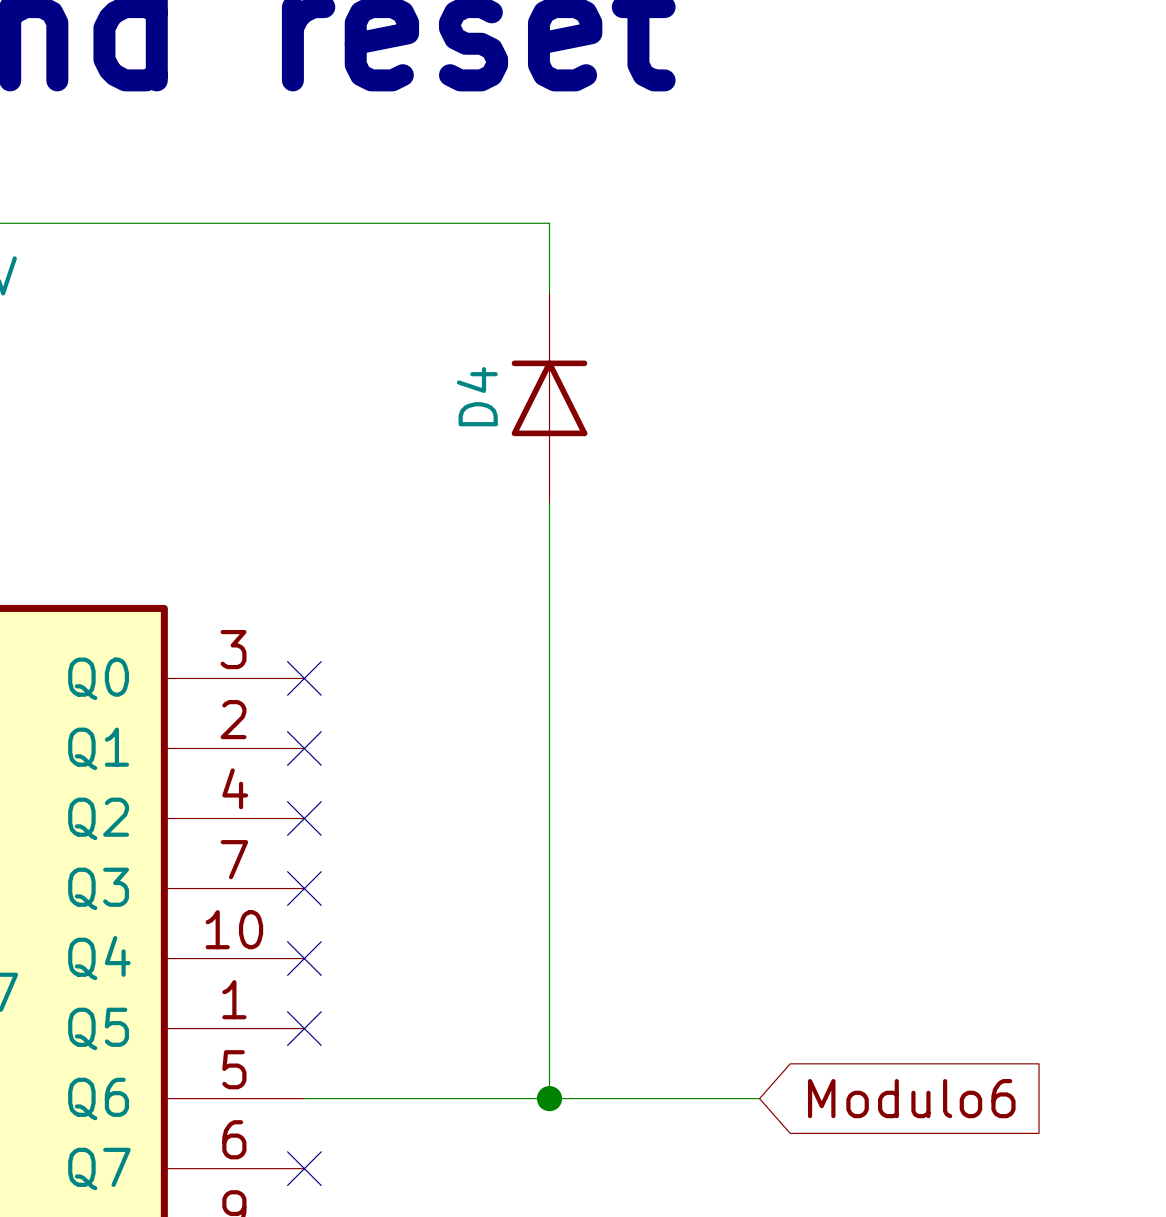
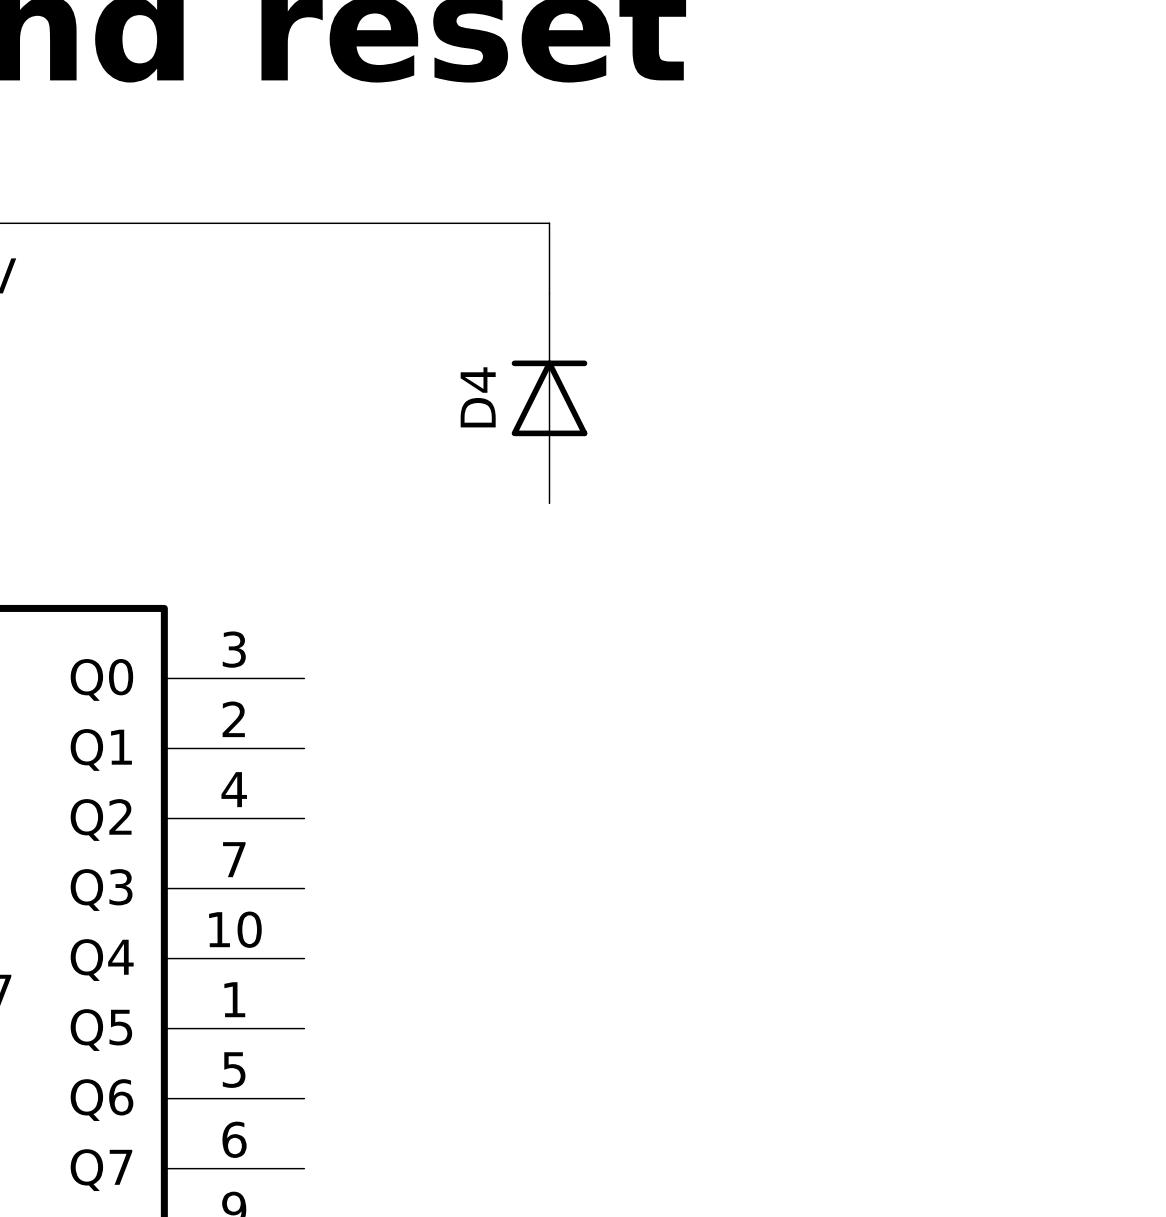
wire: (549, 503) (549, 1098) -> none
no-connect mark: (304, 678) -> none
no-connect mark: (304, 748) -> none
no-connect mark: (304, 818) -> none
no-connect mark: (304, 888) -> none
no-connect mark: (304, 958) -> none
no-connect mark: (304, 1028) -> none
wire: (304, 1098) (759, 1098) -> none
junction: (549, 1098) -> none
global label: Modulo6 (911, 1098) -> none
no-connect mark: (304, 1168) -> none

